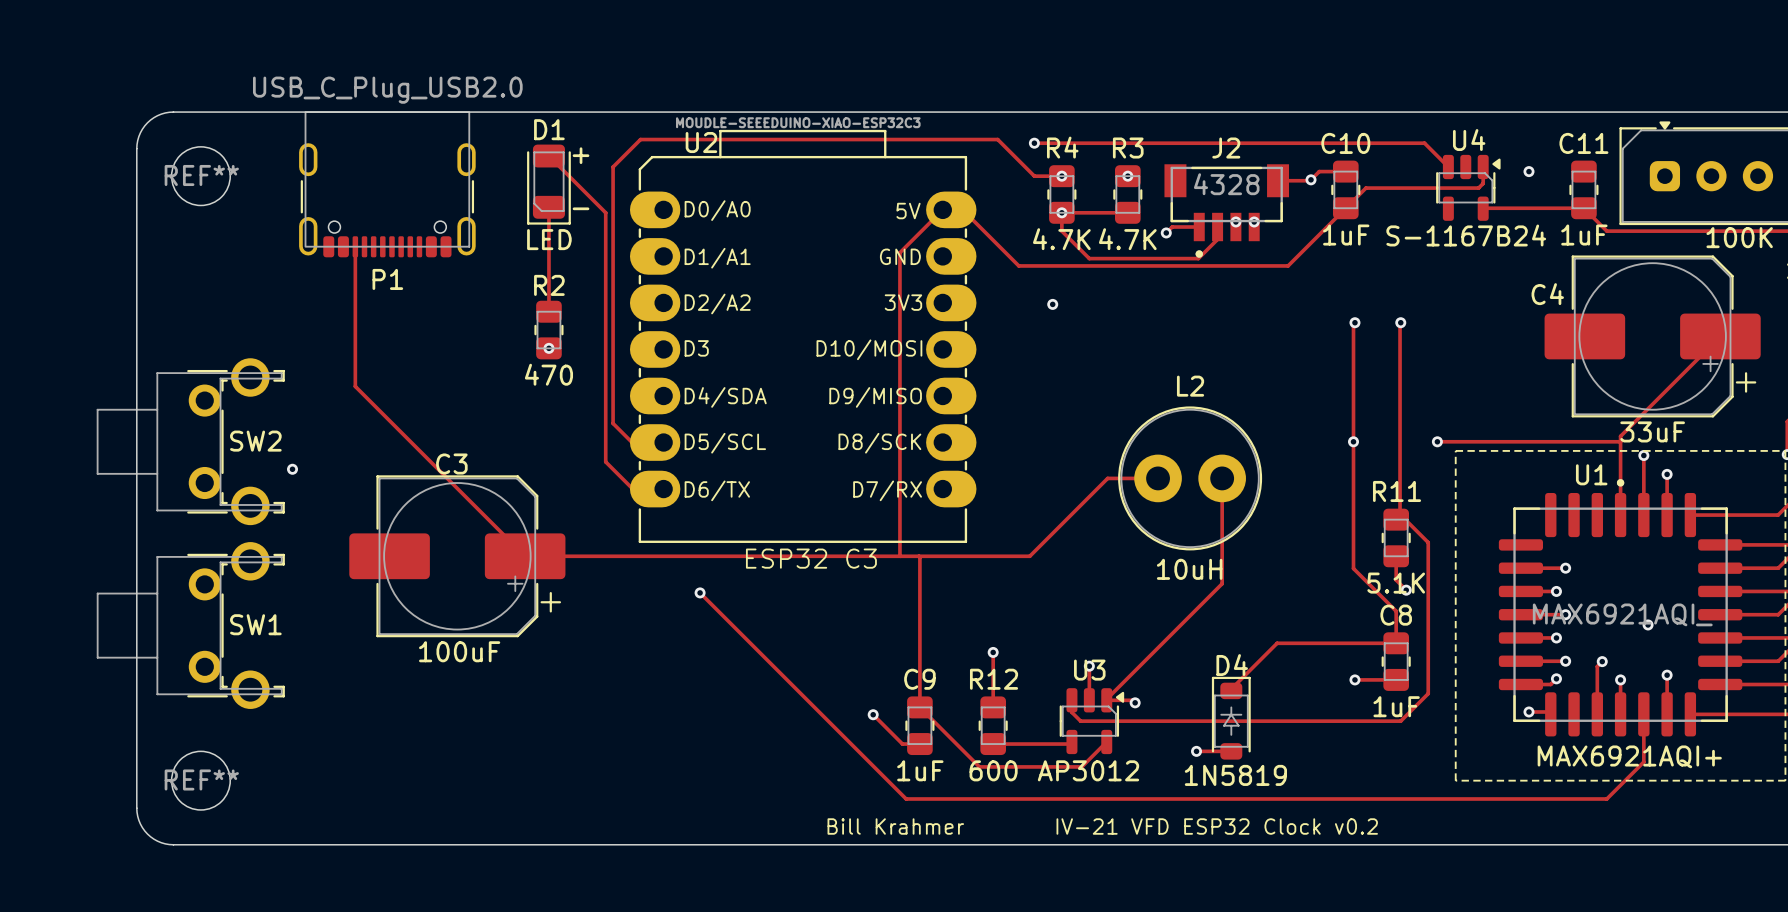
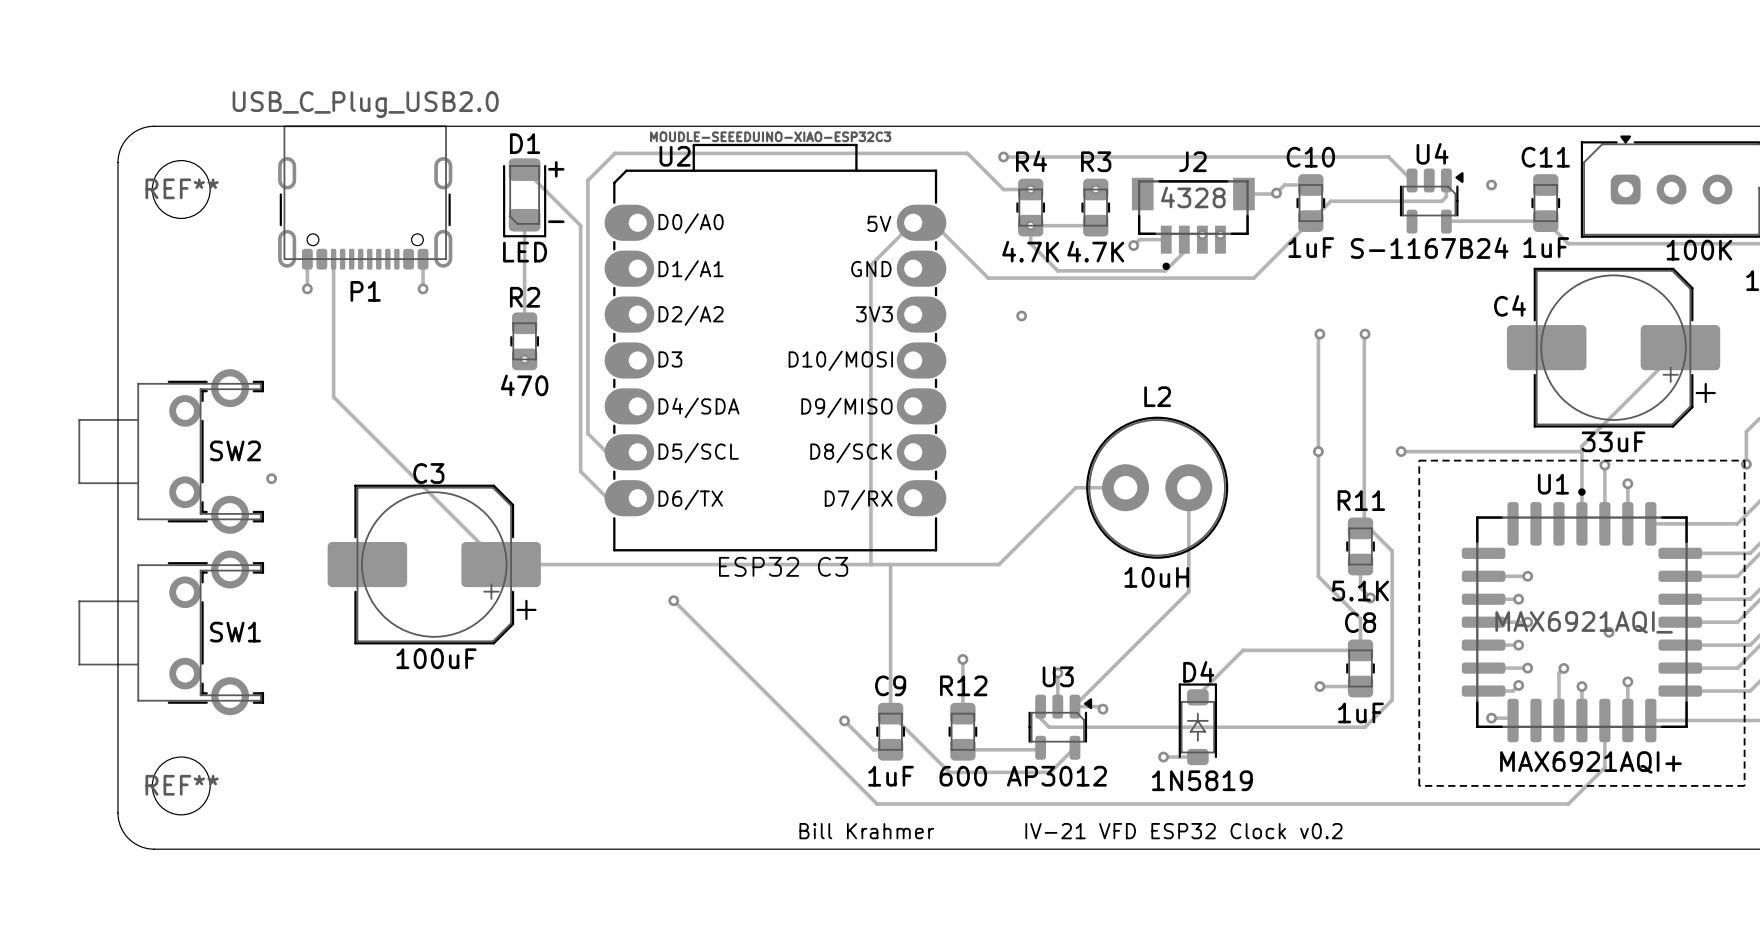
track: none -> (307, 259) (307, 288)
track: none -> (423, 259) (423, 288)
via: none -> (307, 288)
via: none -> (423, 288)

